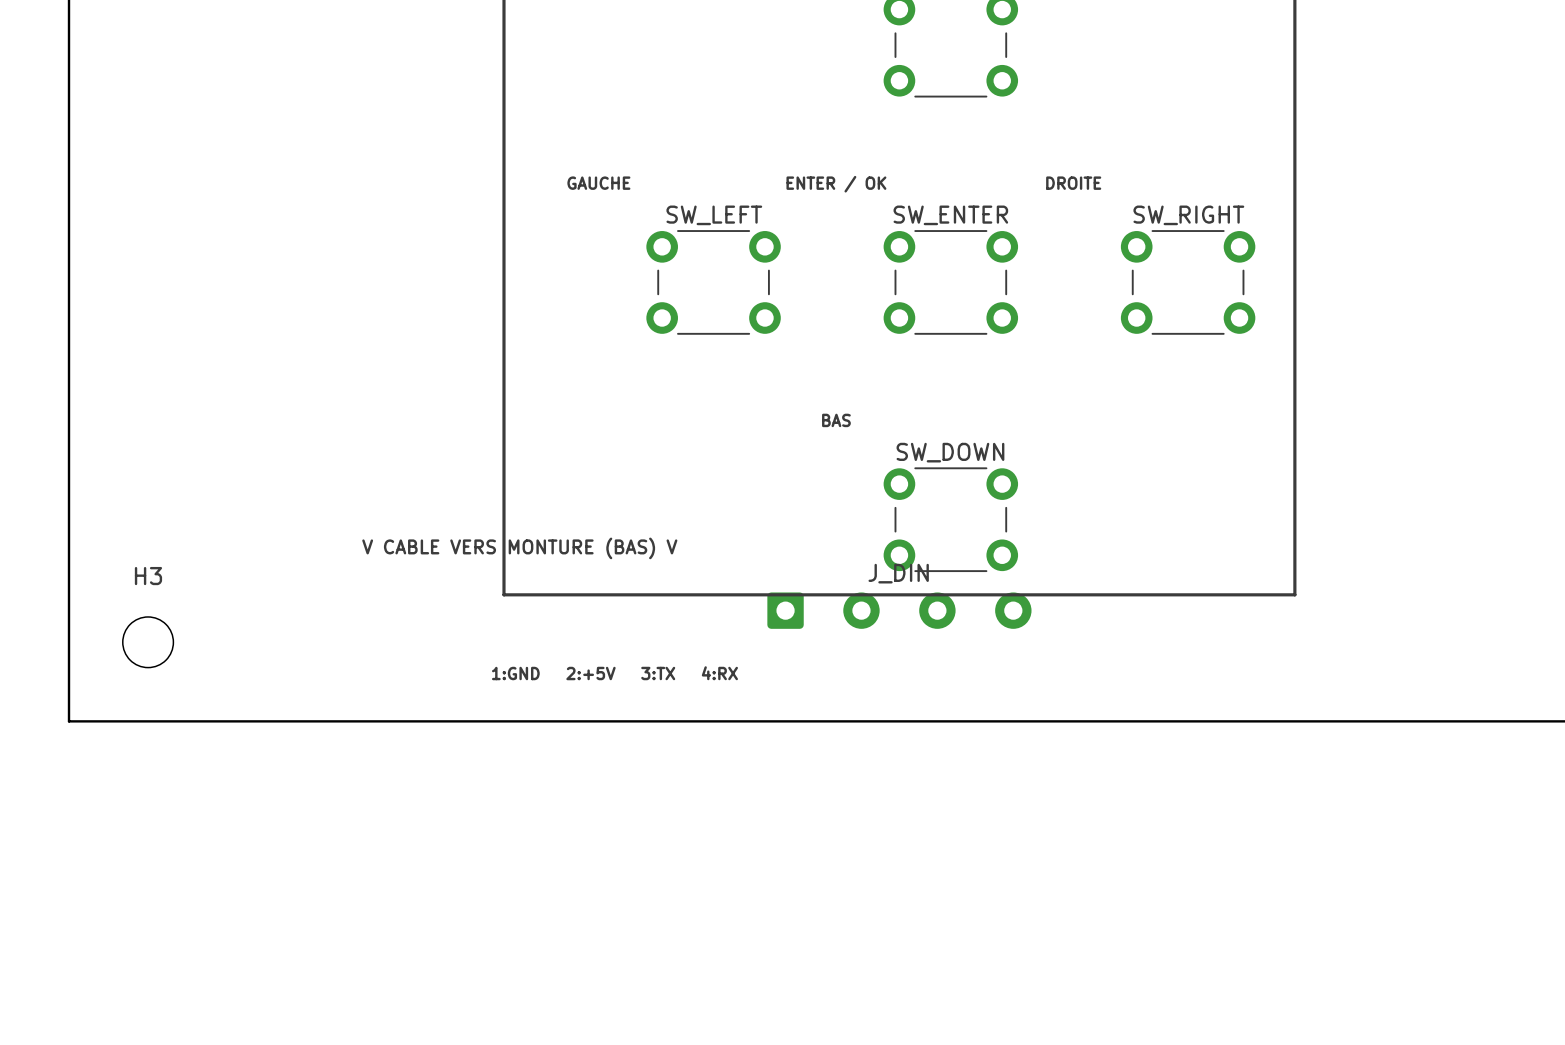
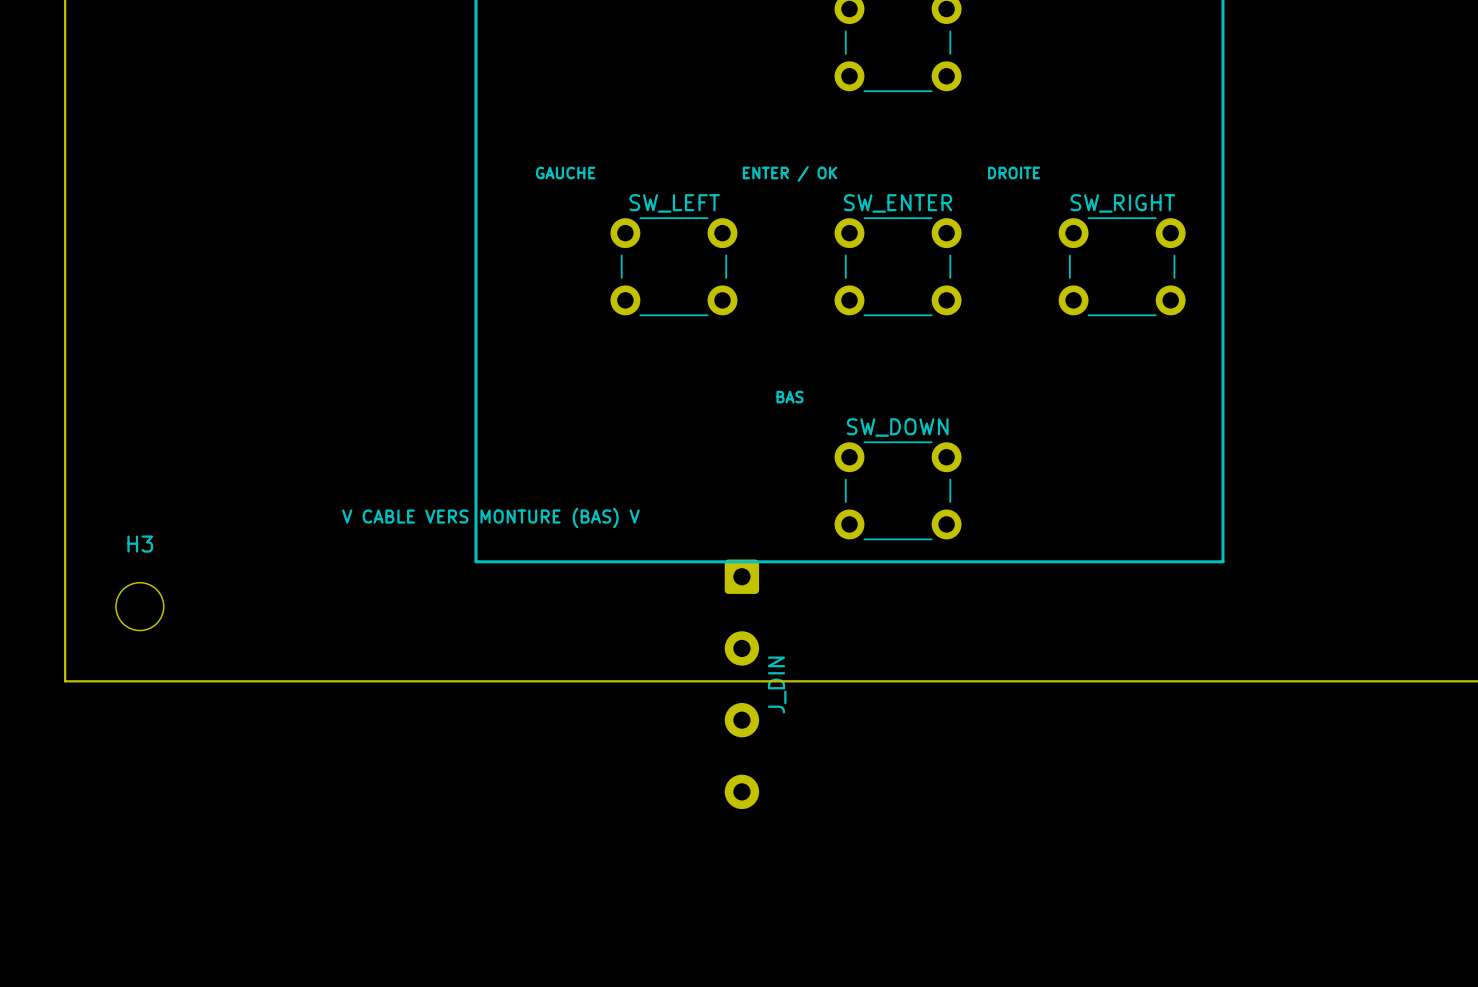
J_DIN rotation: 0° (899, 610) -> 90° clockwise (741, 684)
J_DIN position: (899, 610) -> (741, 684)
text: 1:GND 2:+5V 3:TX 4:RX (614, 673) -> none

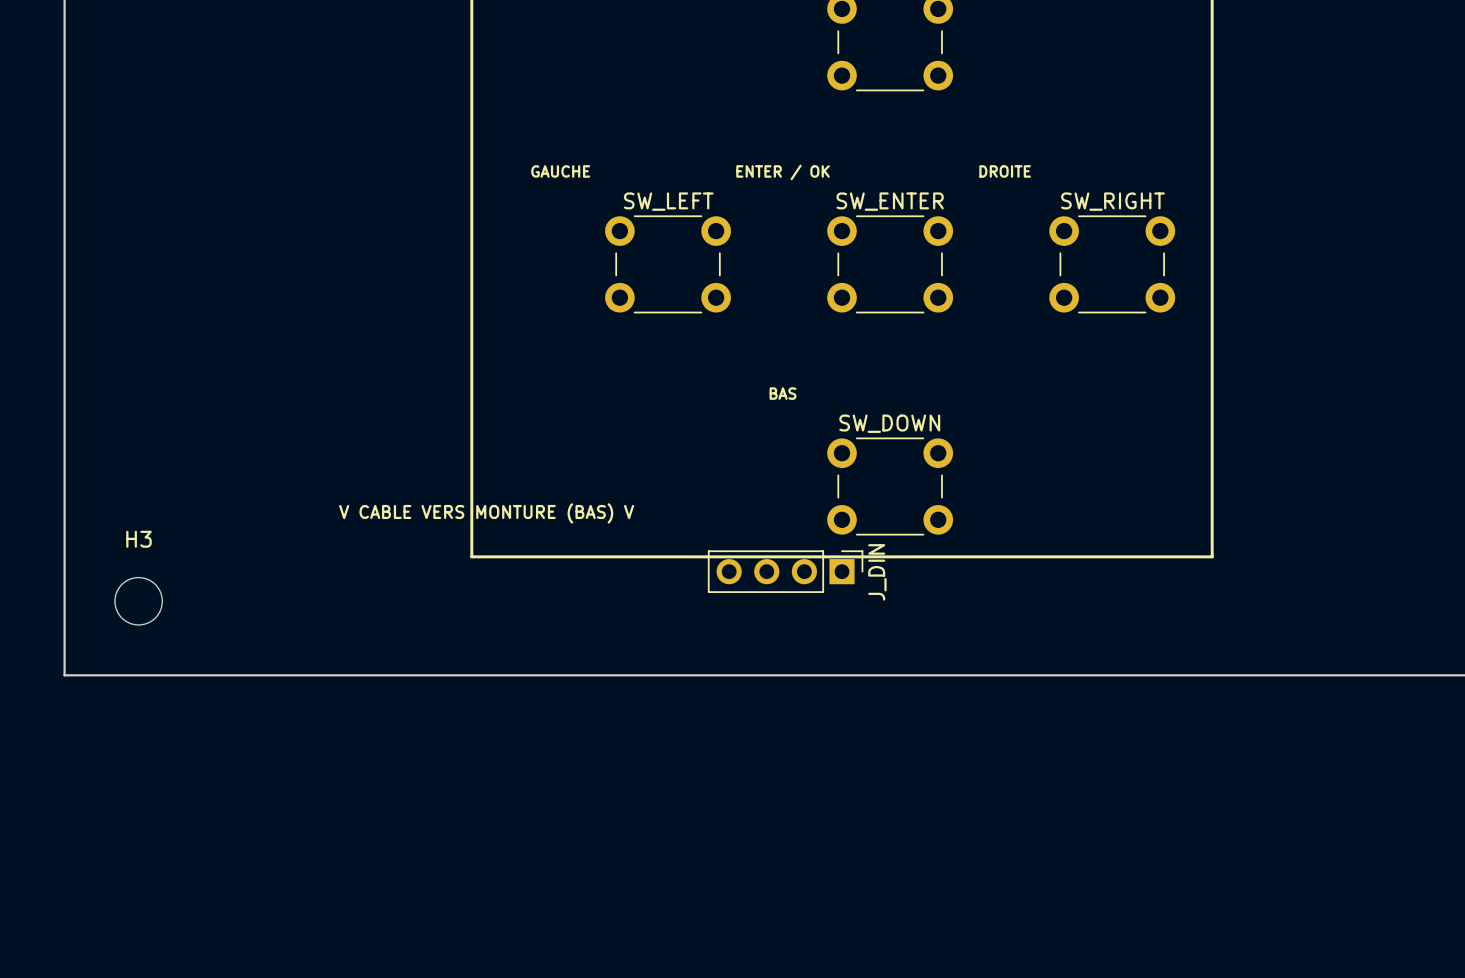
J_DIN: none -> (785, 571)
J_DIN: (741, 684) -> none

